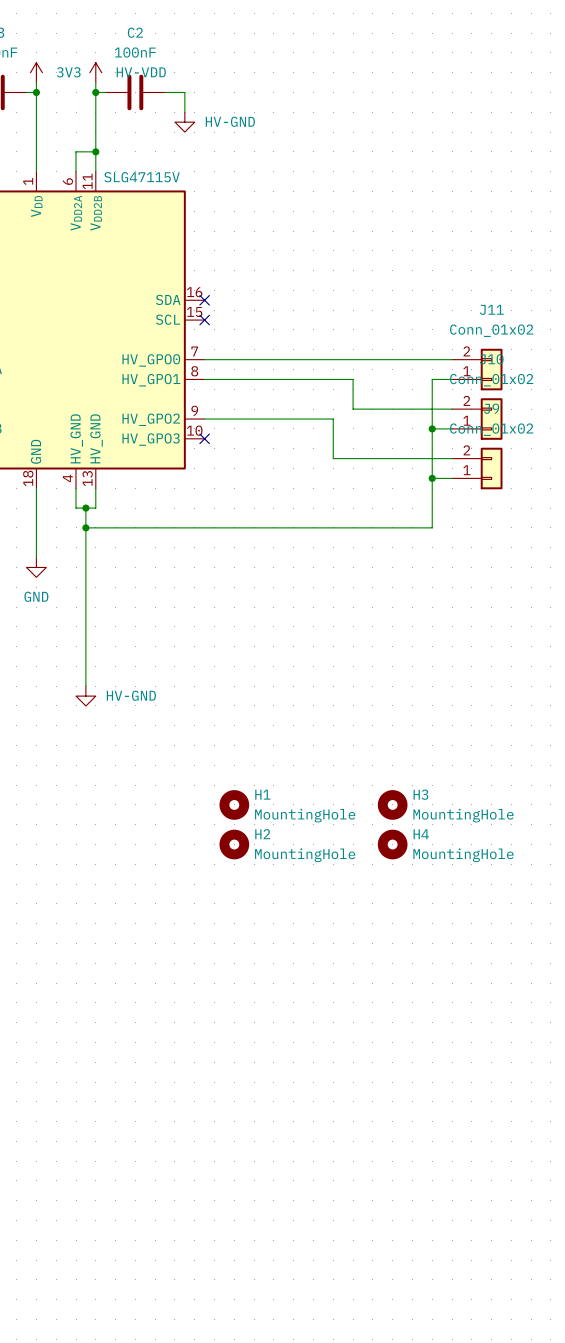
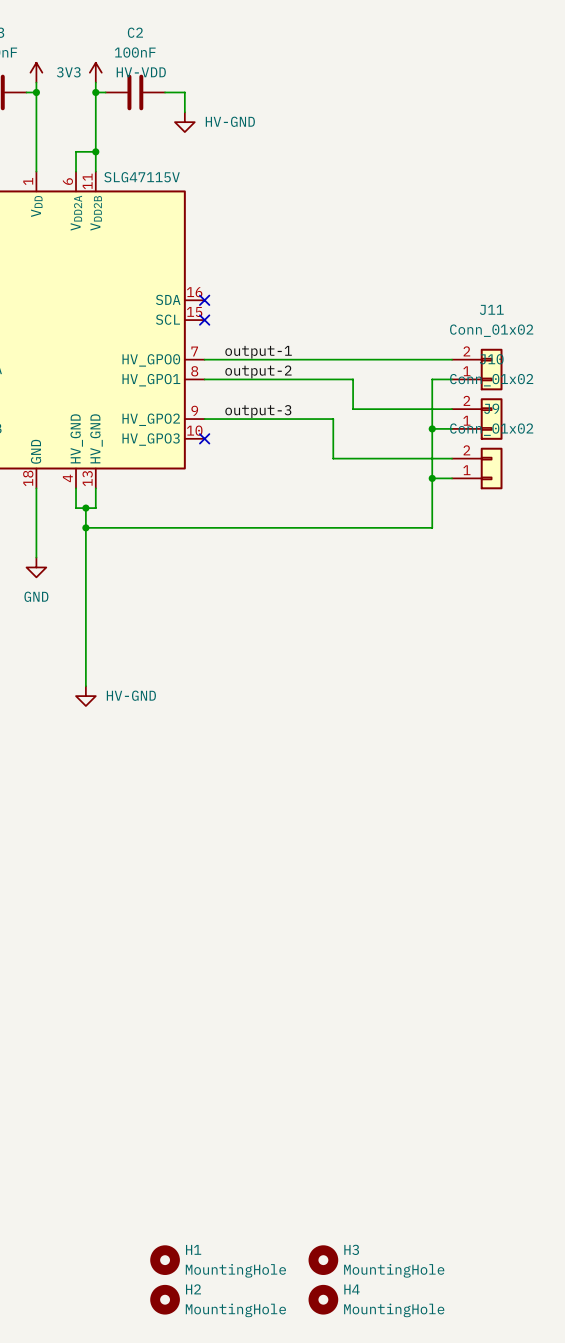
label: none -> output-1 (258, 352)
label: none -> output-2 (258, 371)
label: none -> output-3 (258, 411)
H1 position: (234, 804) -> (165, 1260)
H3 position: (392, 804) -> (323, 1260)
H2 position: (234, 844) -> (165, 1299)
H4 position: (392, 844) -> (323, 1299)

